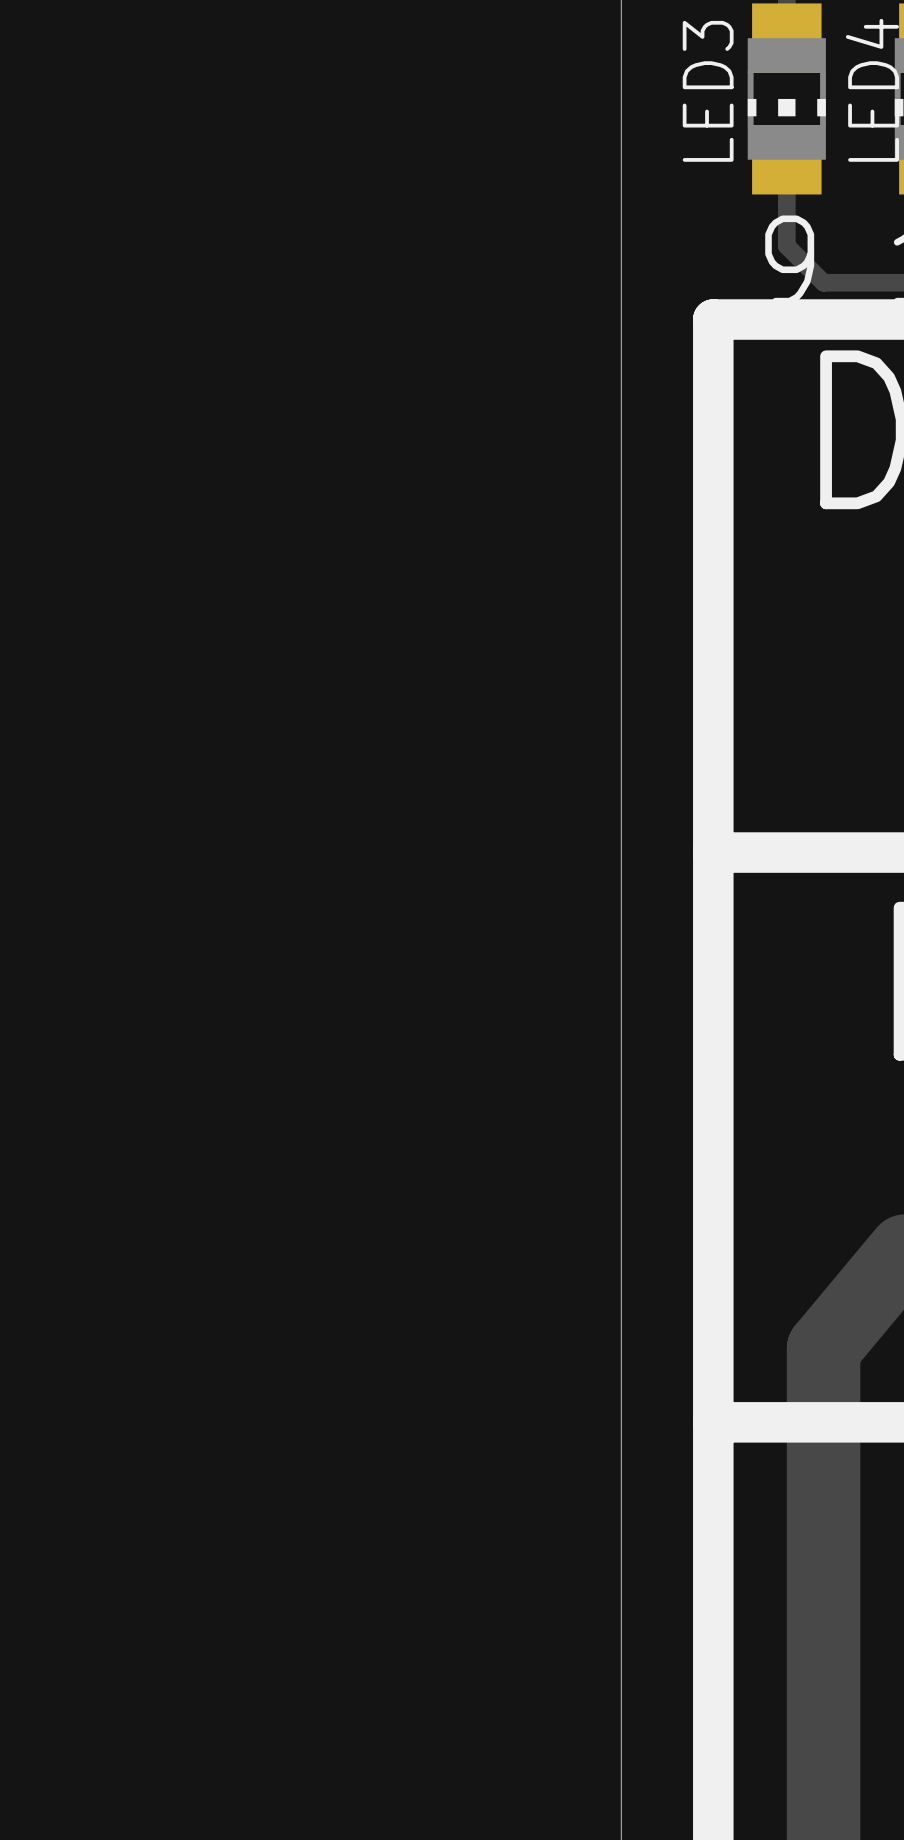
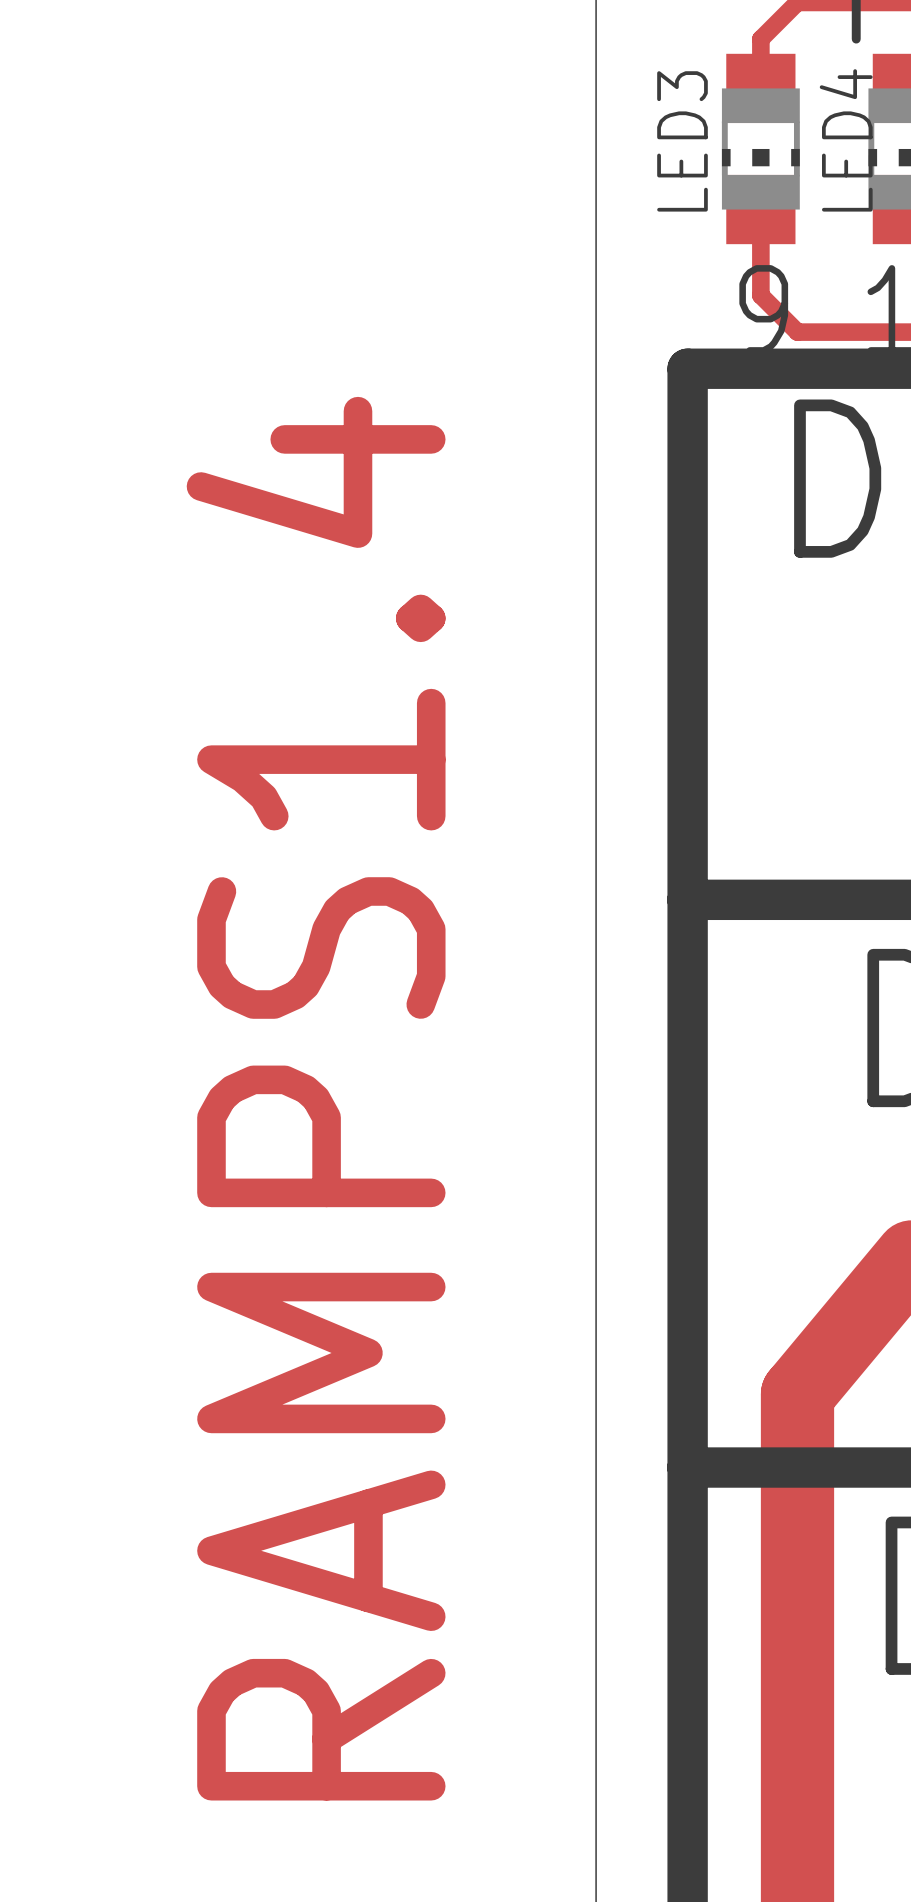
text: none -> RAMPS1.4 (316, 1098)

